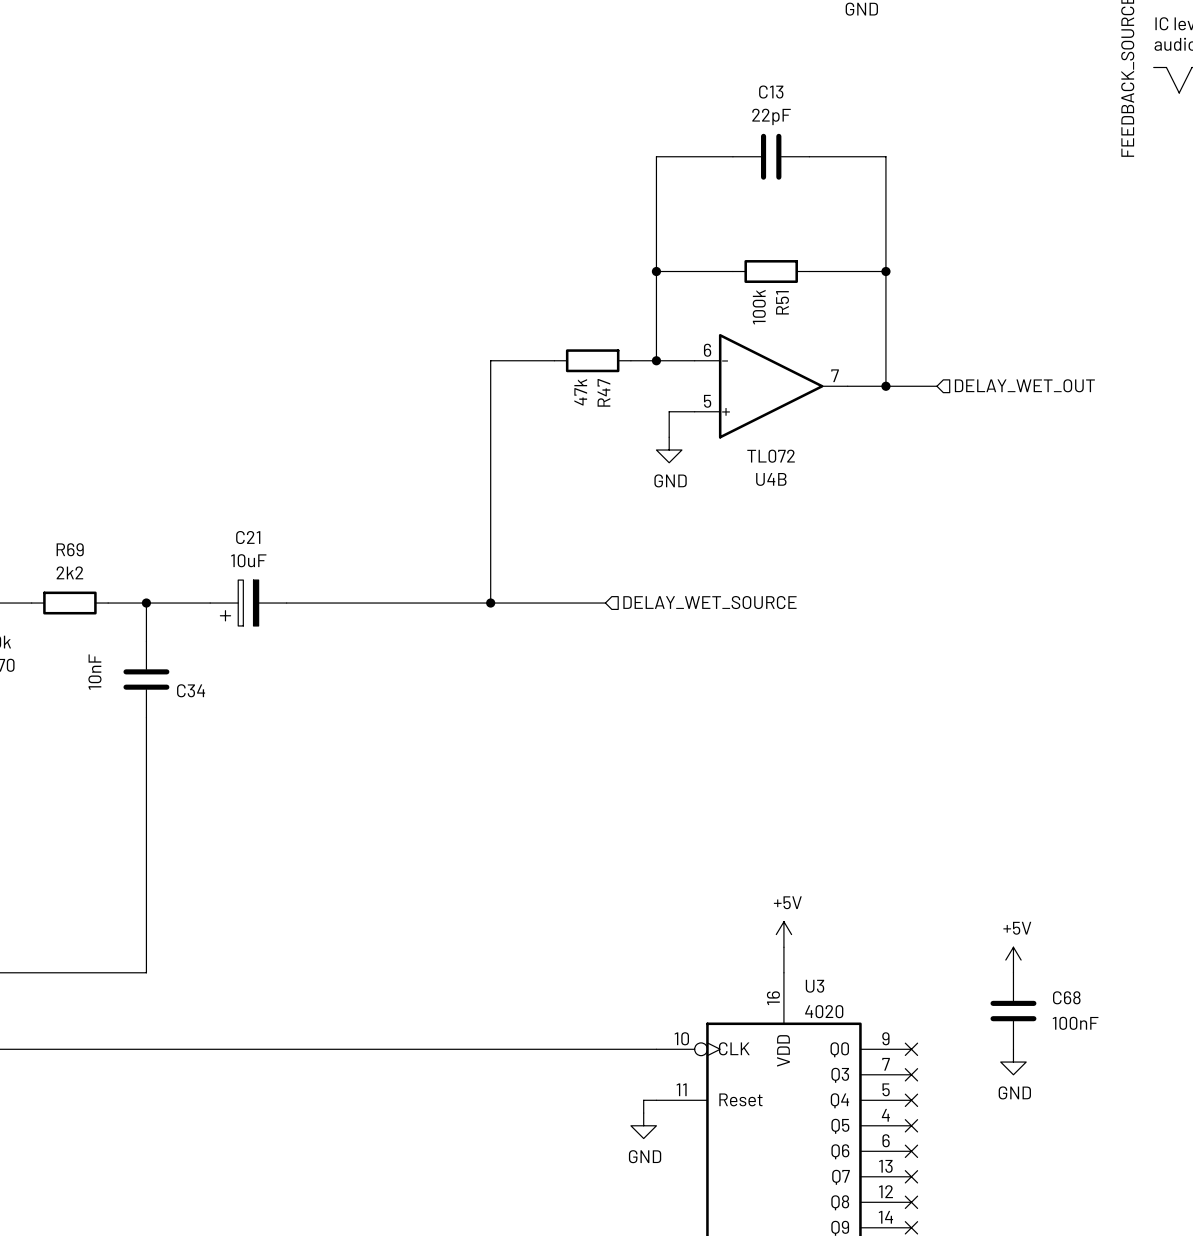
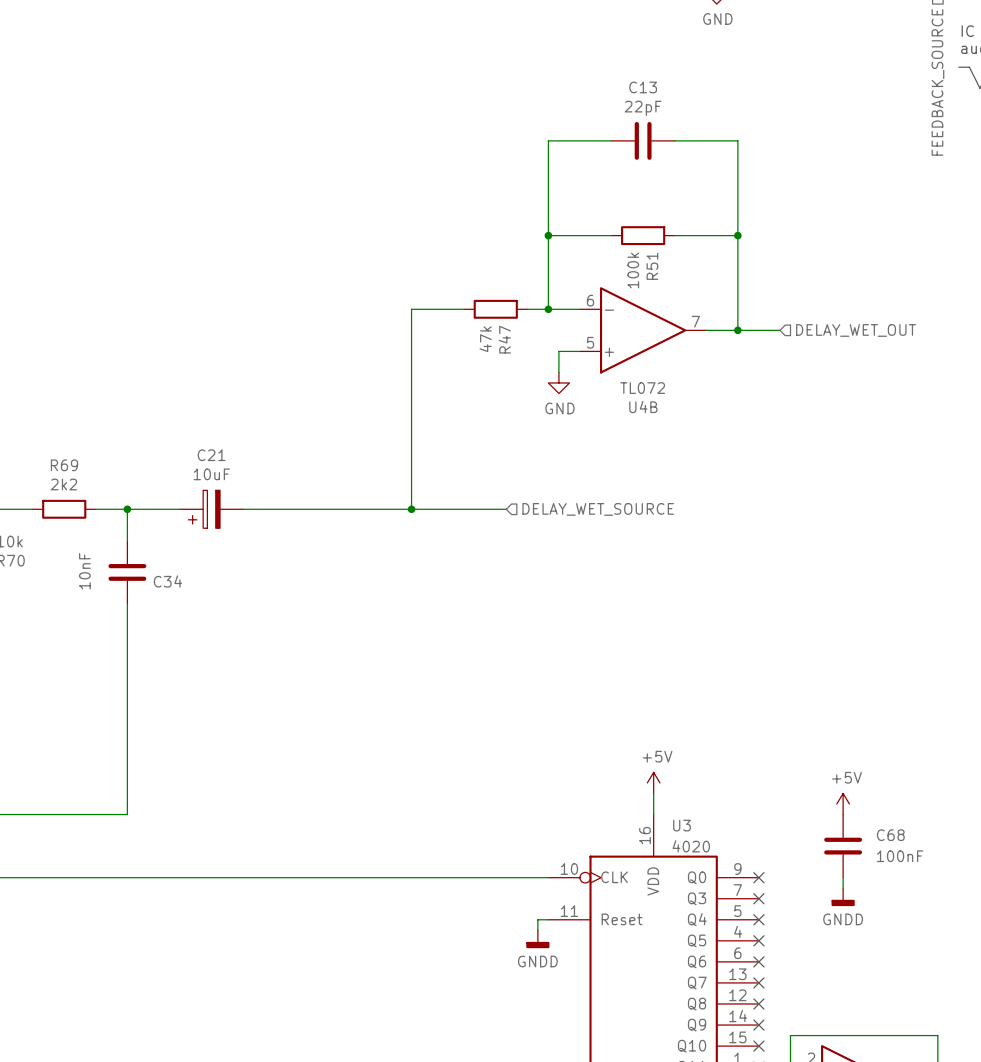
power symbol: GND (1013, 1062) -> none
power symbol: none -> GNDD (843, 897)
power symbol: GND (643, 1125) -> GNDD (537, 939)

